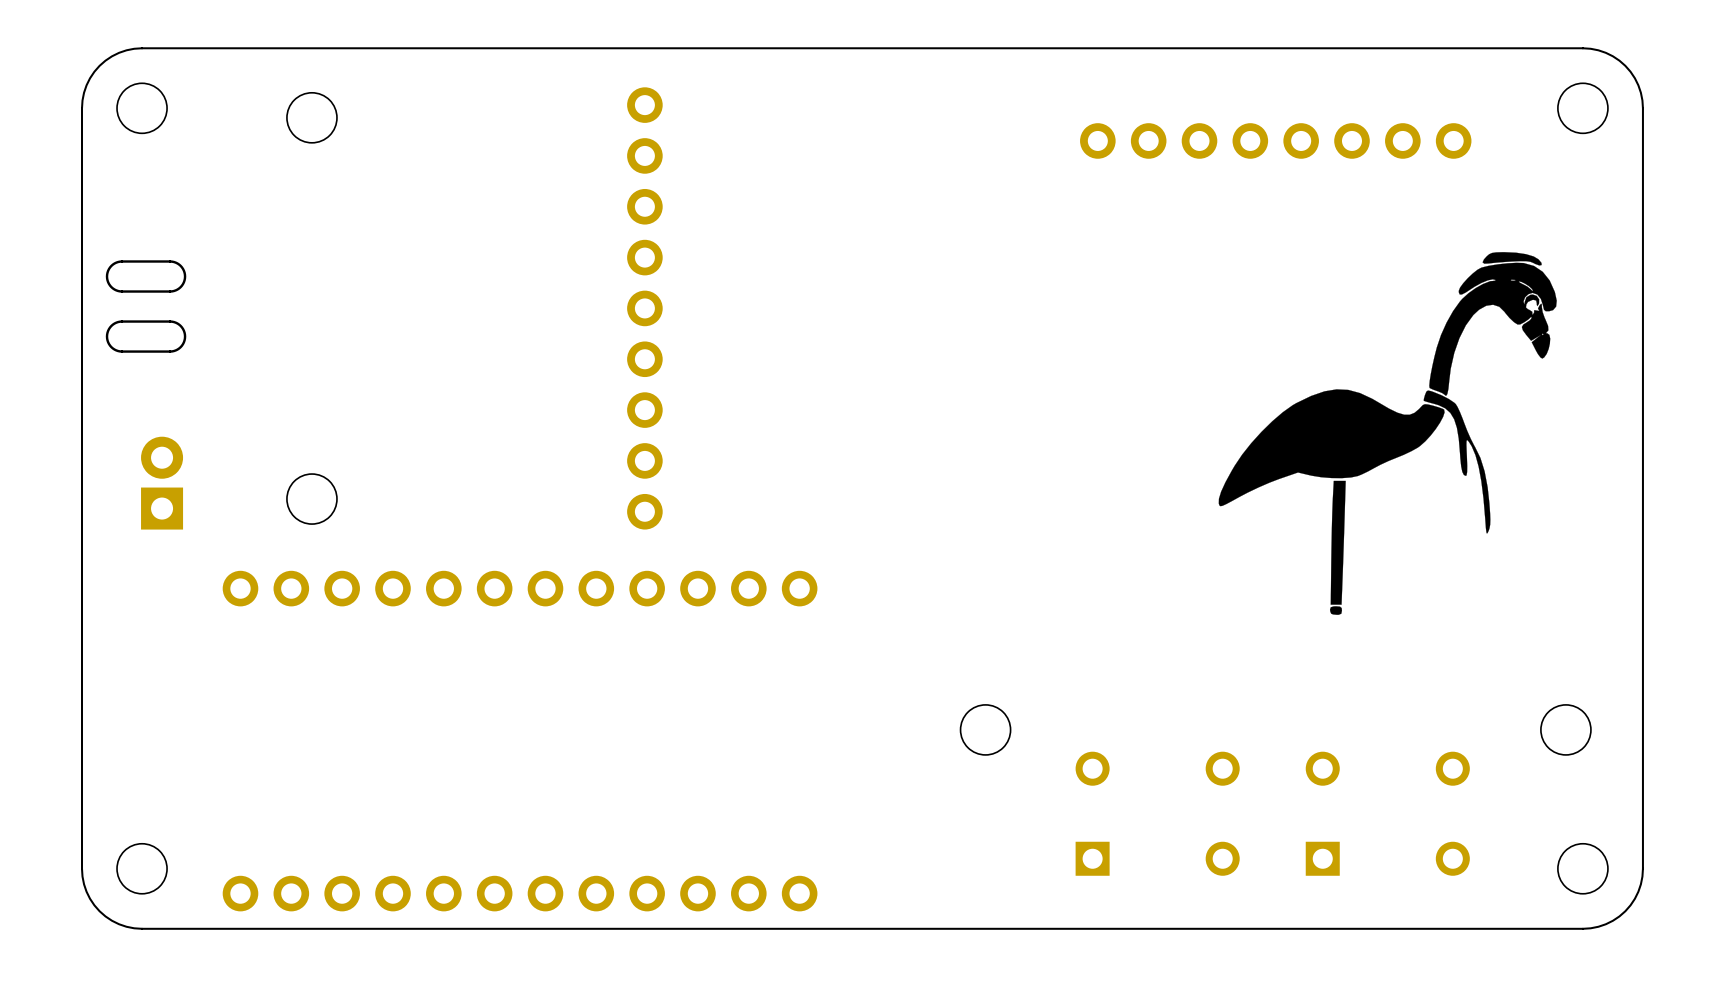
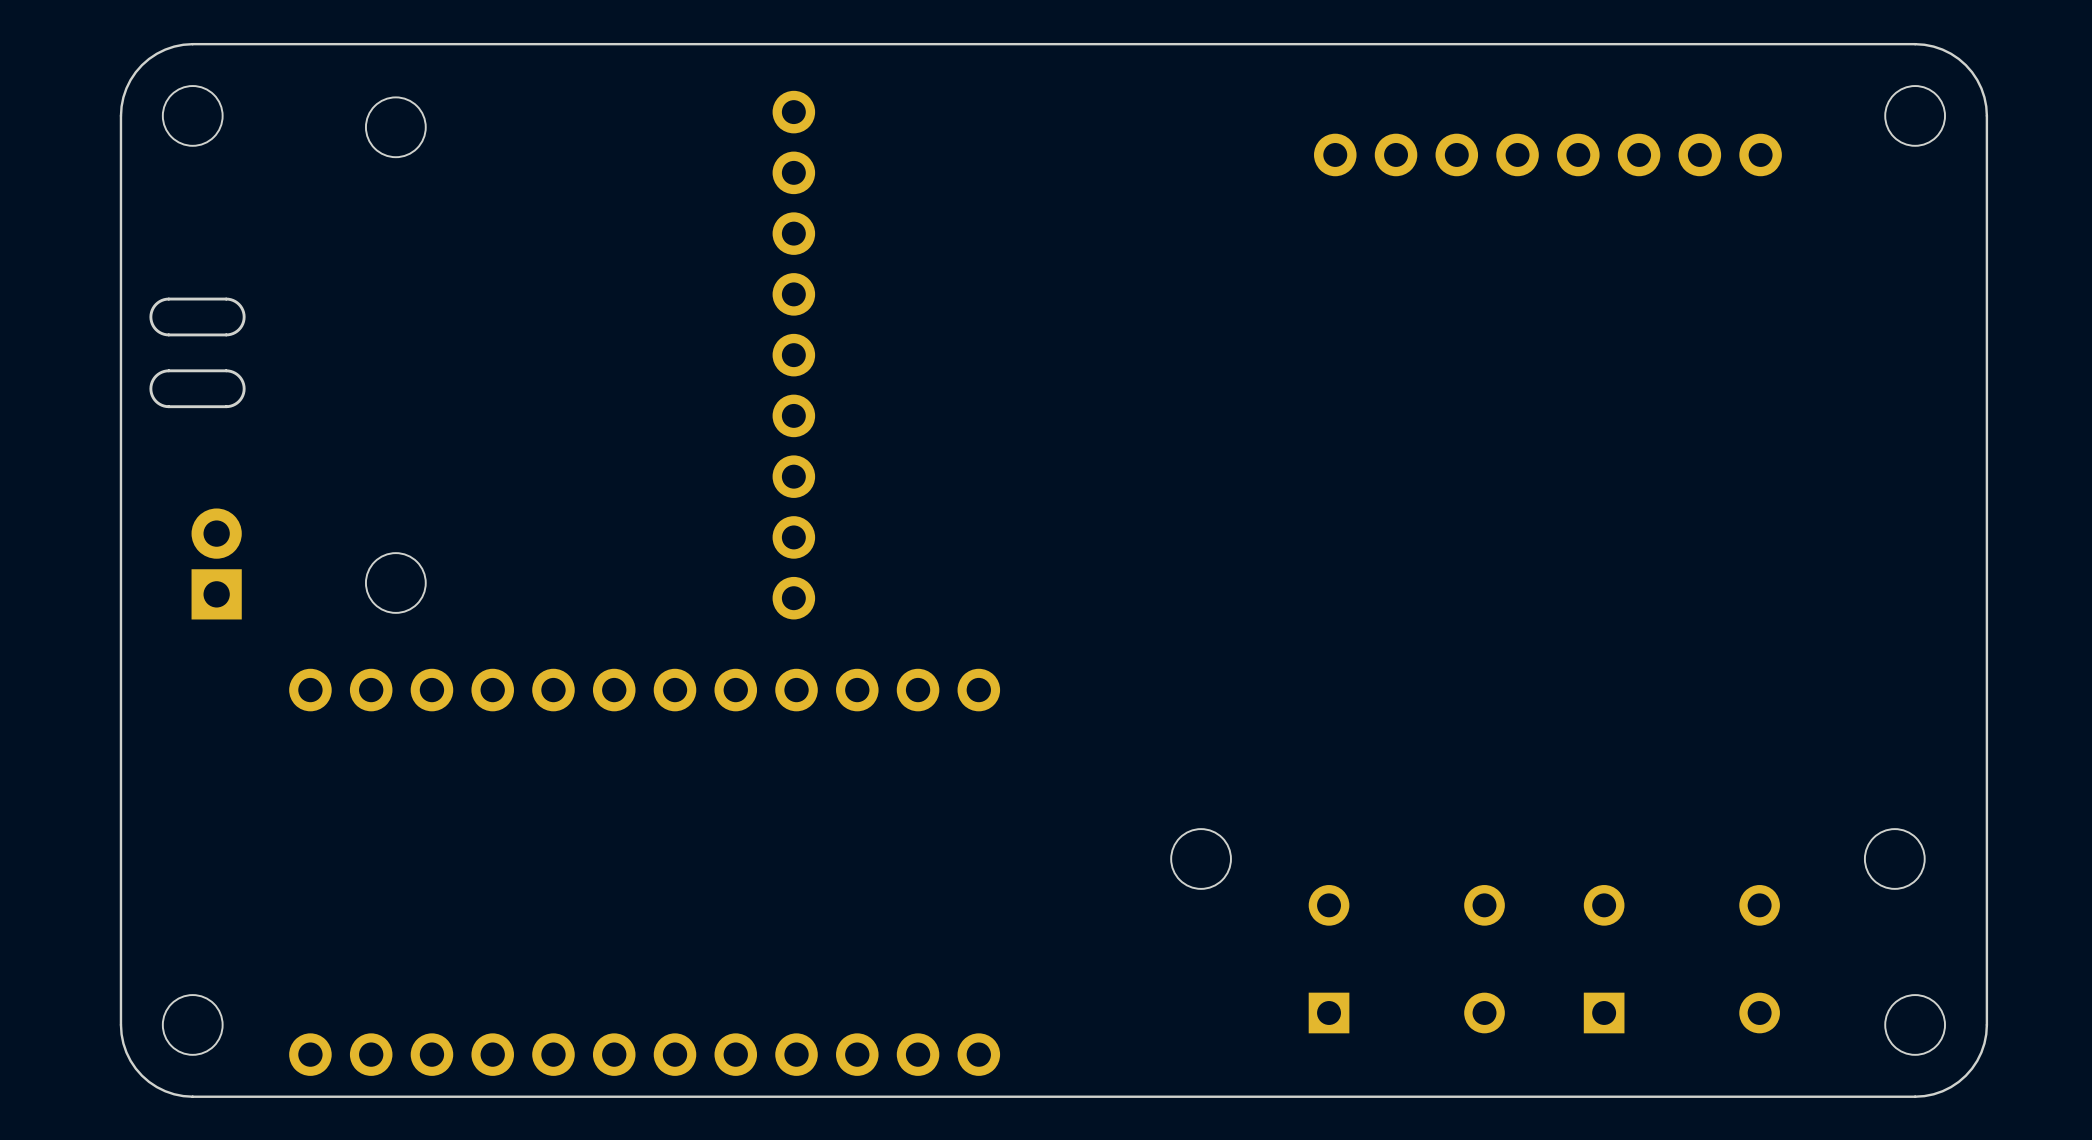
drawing: [1218, 252, 1557, 615] -> none

